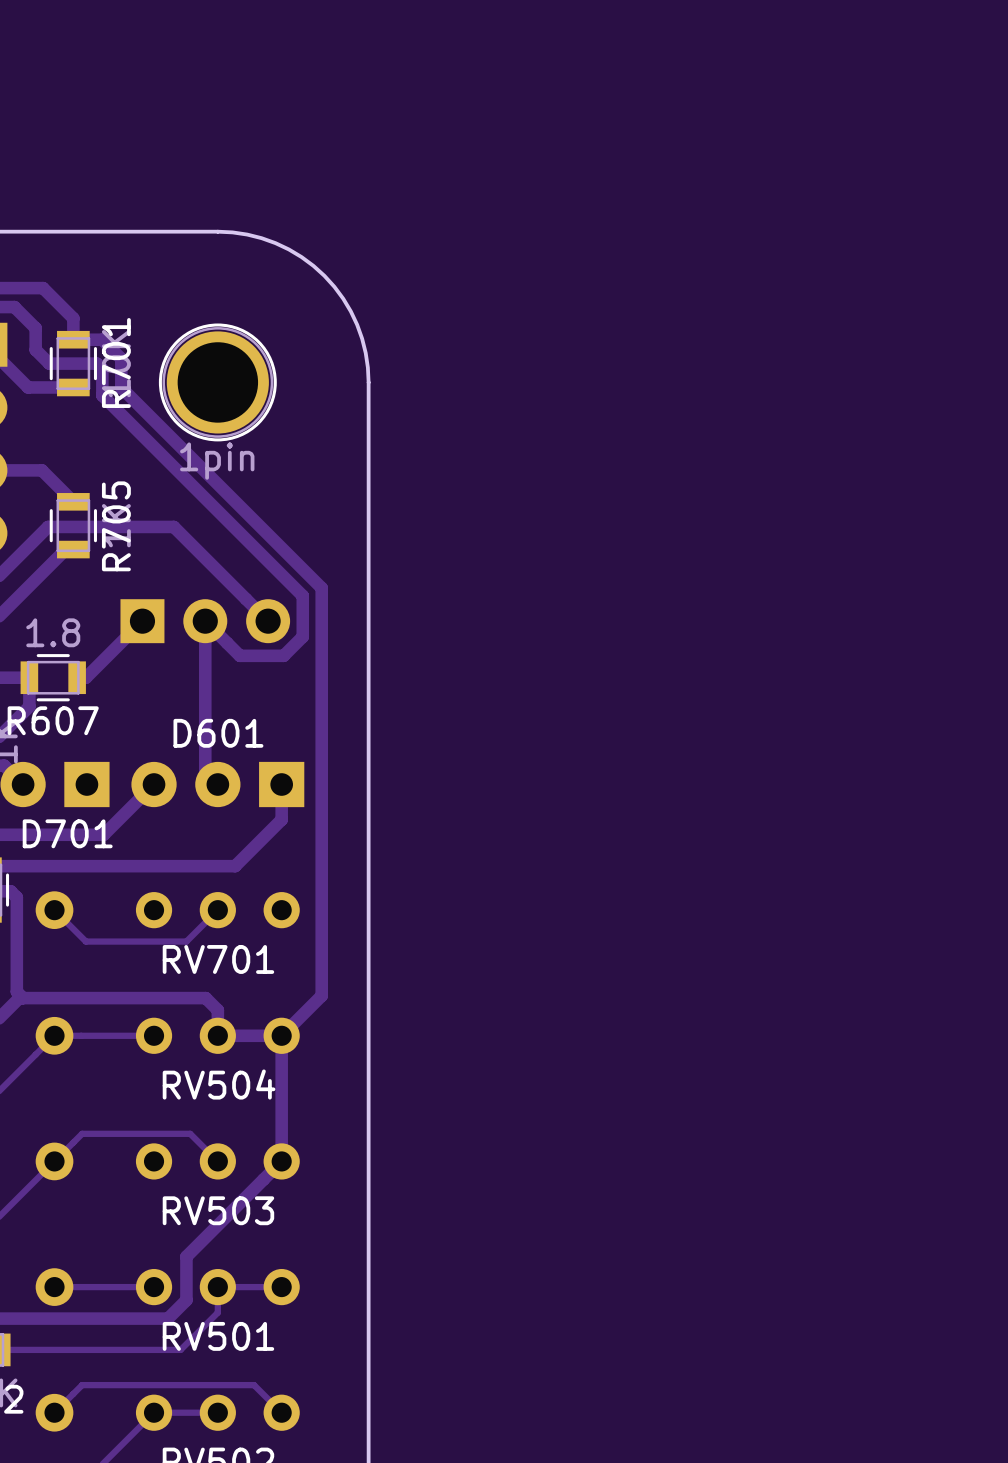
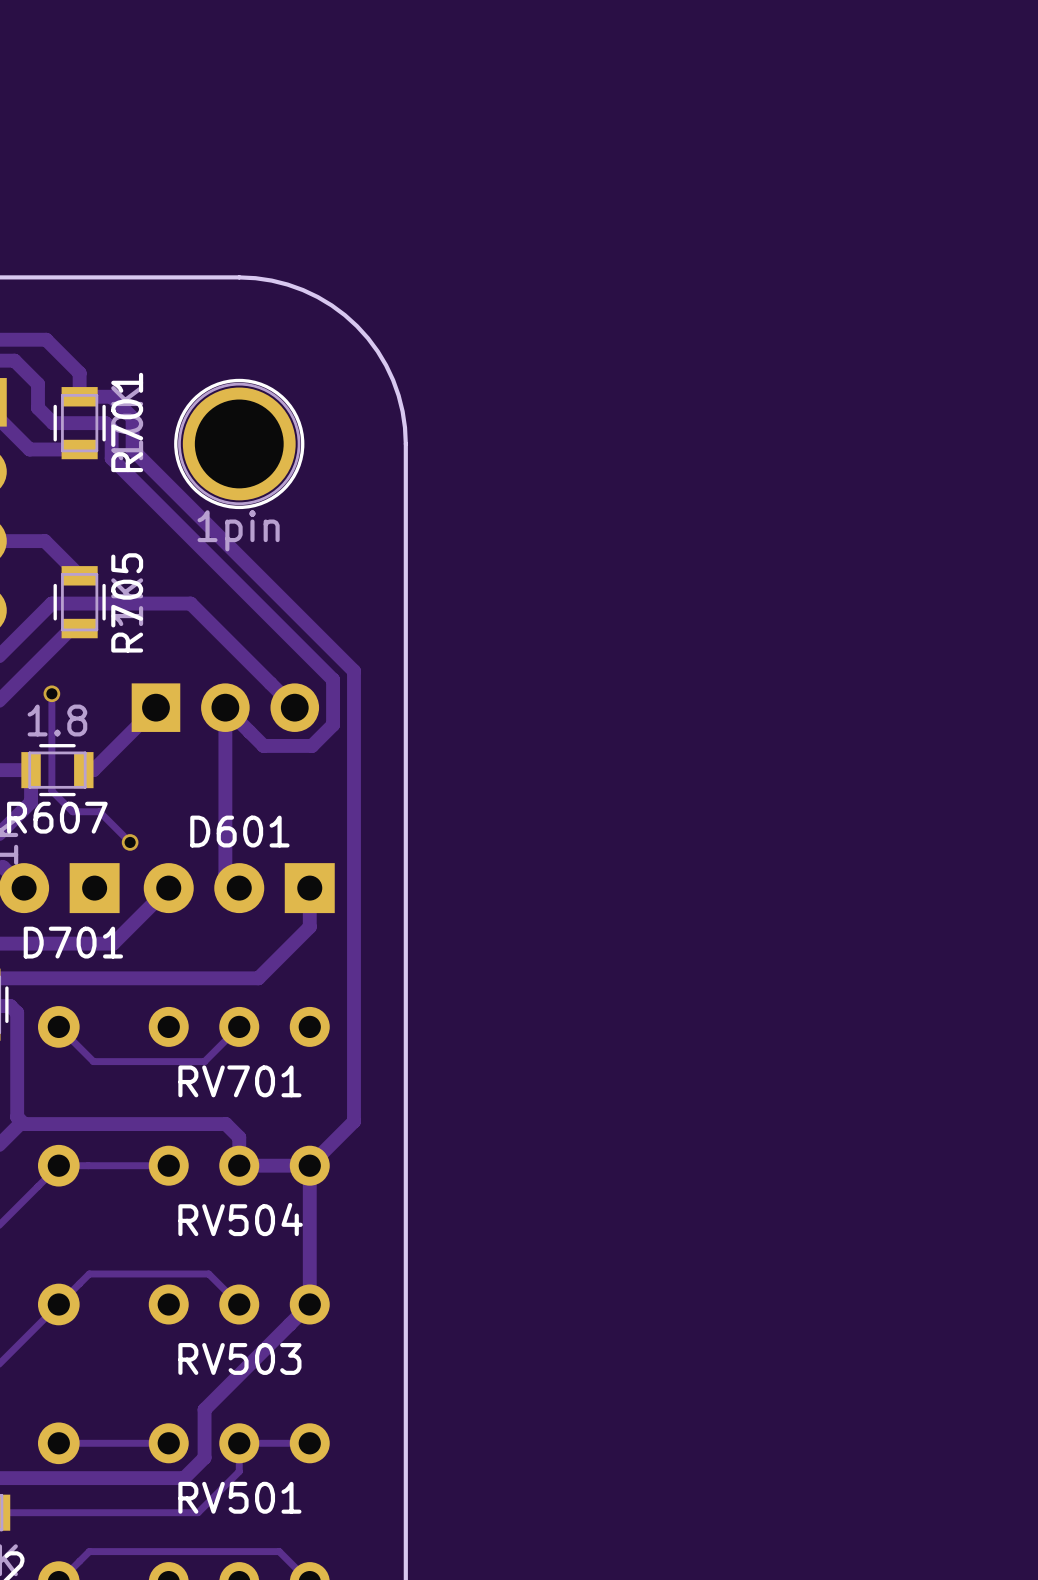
track: none -> (51, 693) (51, 790) (72, 811) (99, 811) (130, 842)
via: none -> (51, 693)
via: none -> (130, 842)

